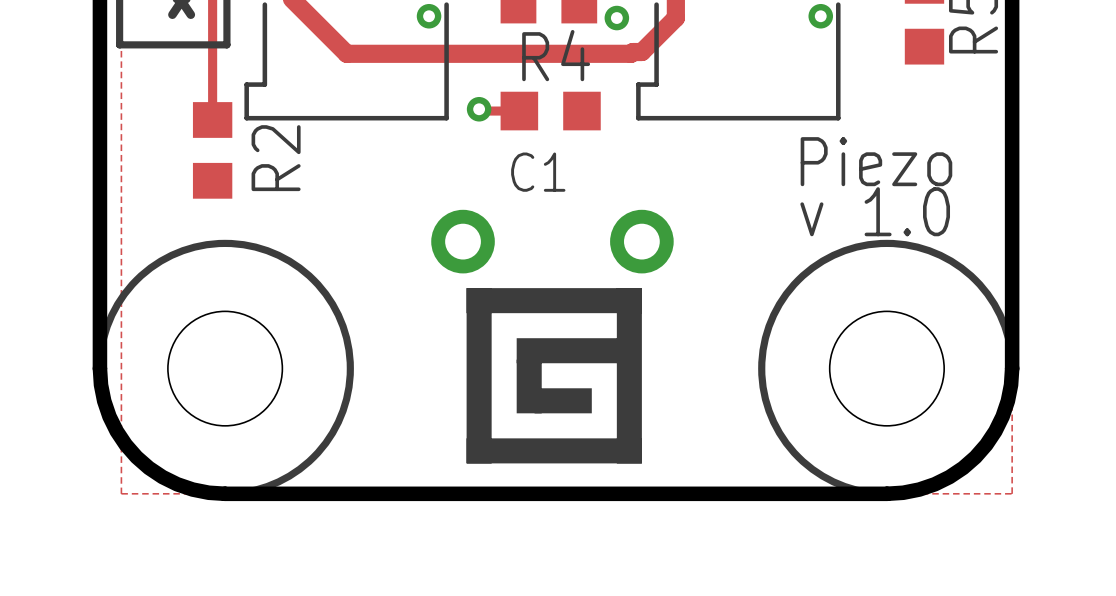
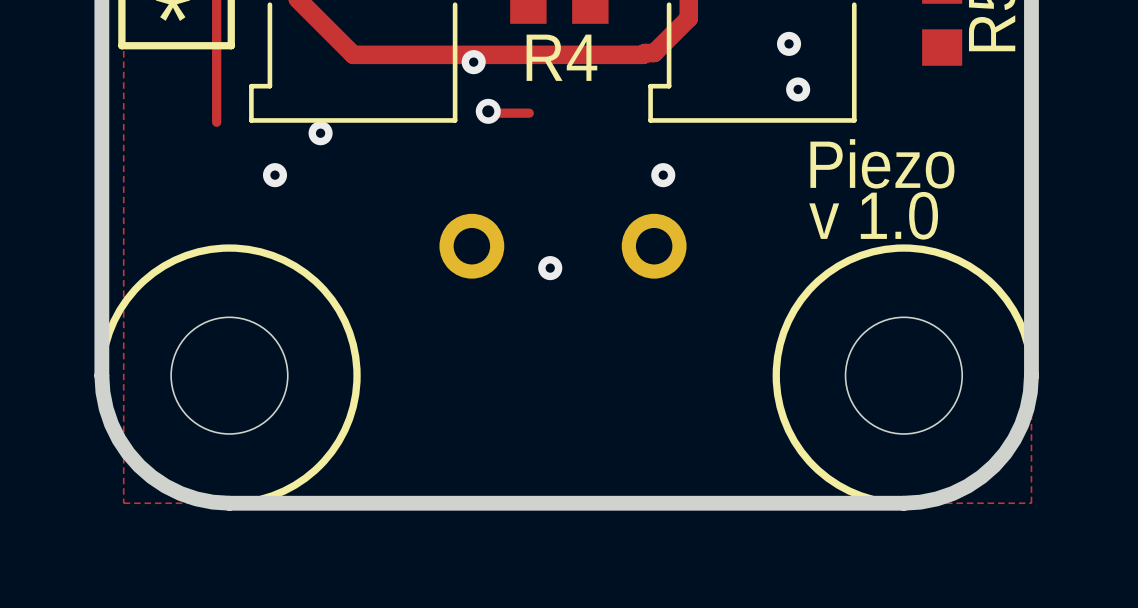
via: (429, 16) -> none
via: (820, 16) -> none
via: (616, 18) -> none
via: none -> (789, 43)
via: none -> (473, 62)
via: none -> (798, 89)
C1: (550, 111) -> none
via: none -> (320, 133)
R2: (212, 150) -> none
via: none -> (275, 175)
via: none -> (663, 175)
via: none -> (550, 268)
drawing: [466, 288, 642, 464] -> none

